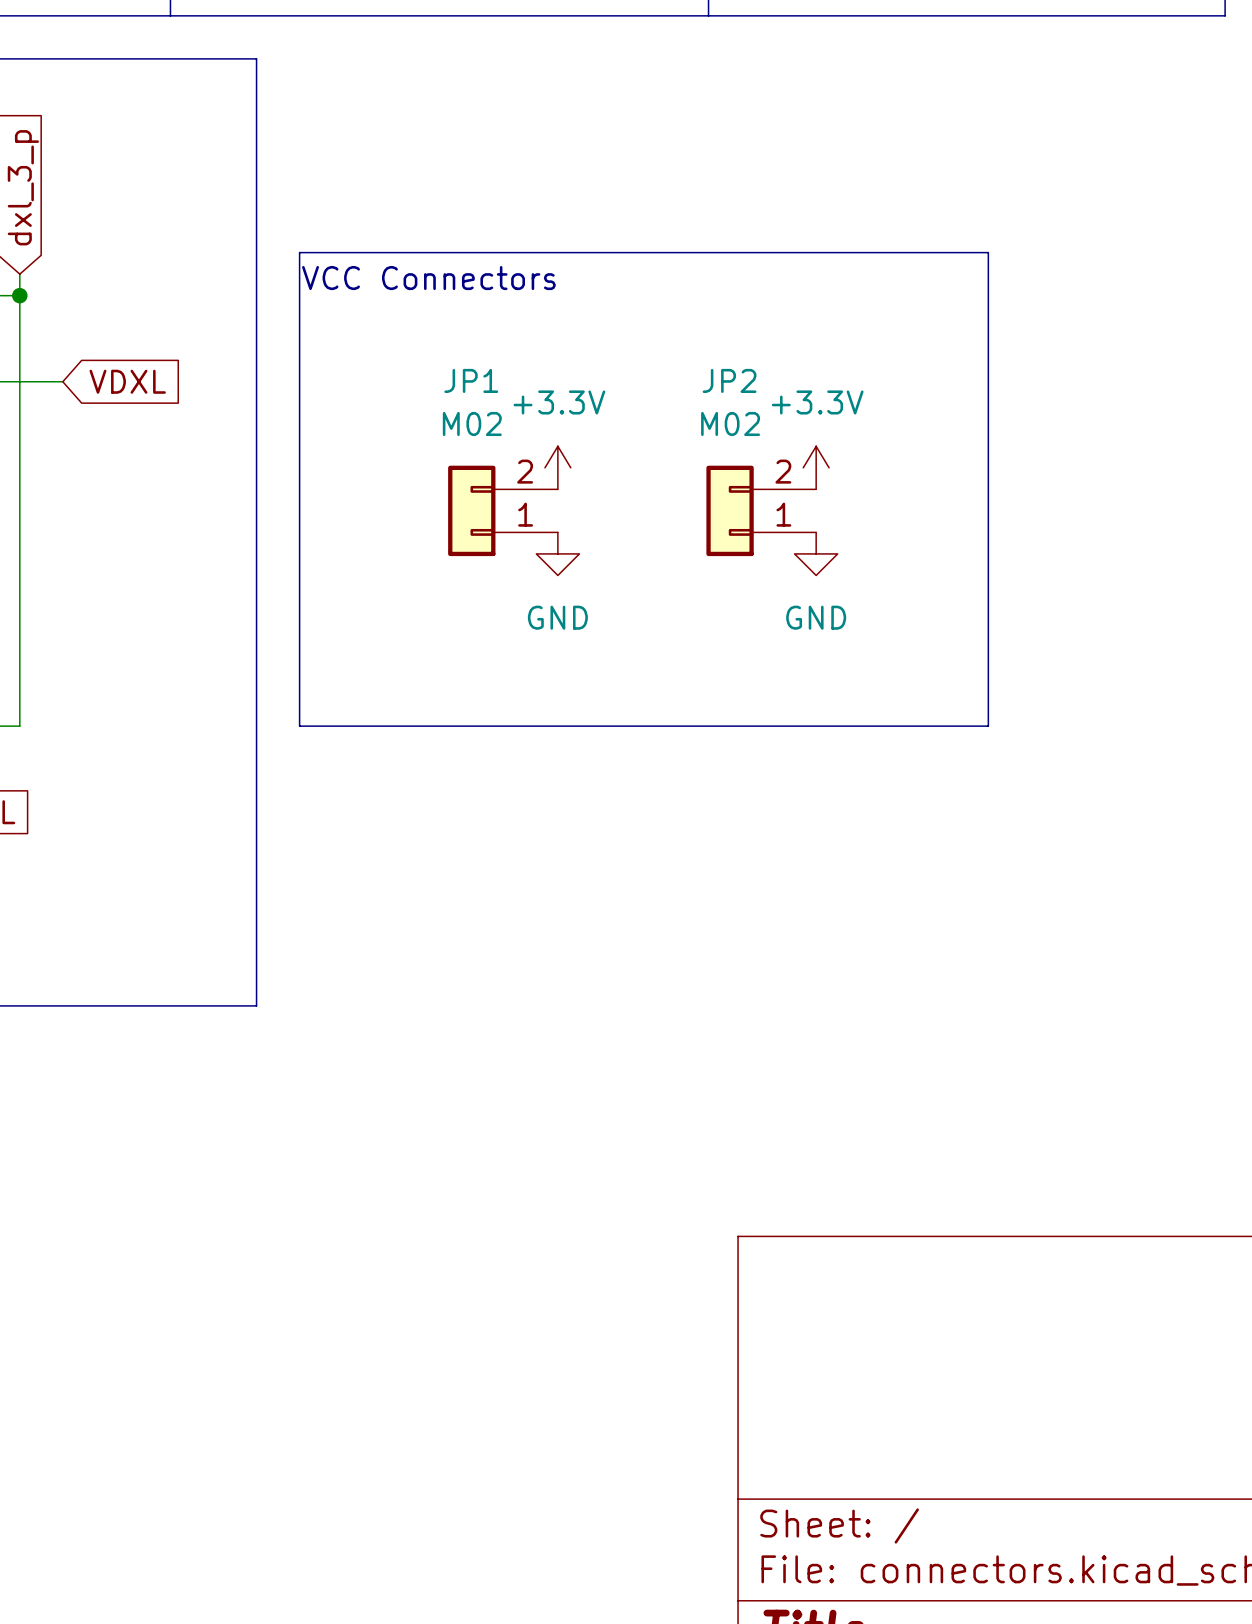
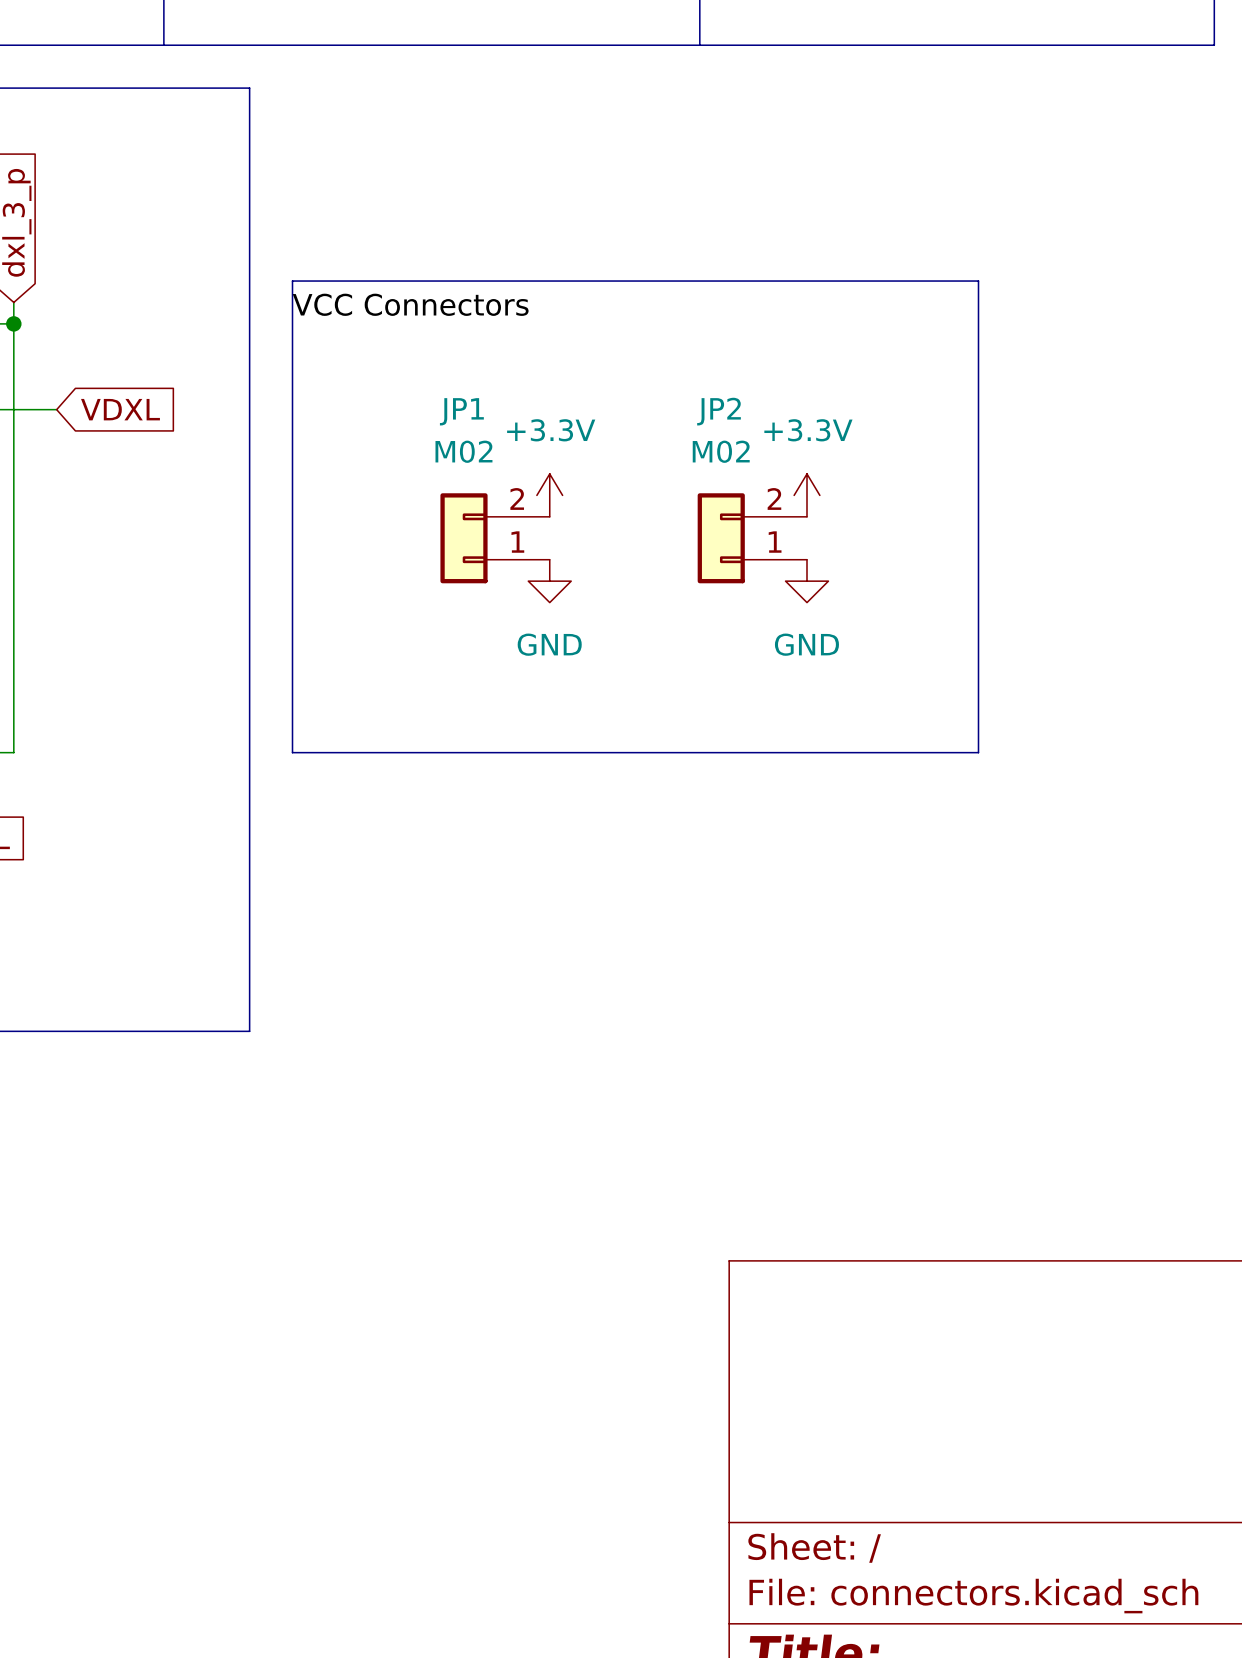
label: none -> VCC Connectors (410, 304)
text: VCC Connectors (428, 278) -> none

